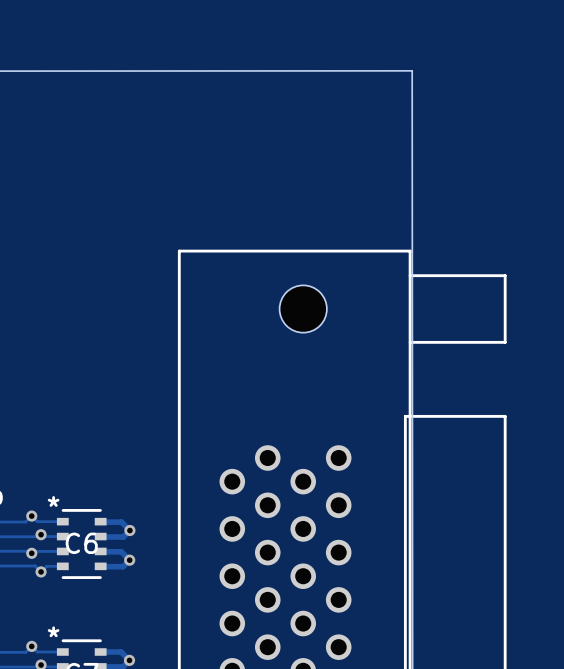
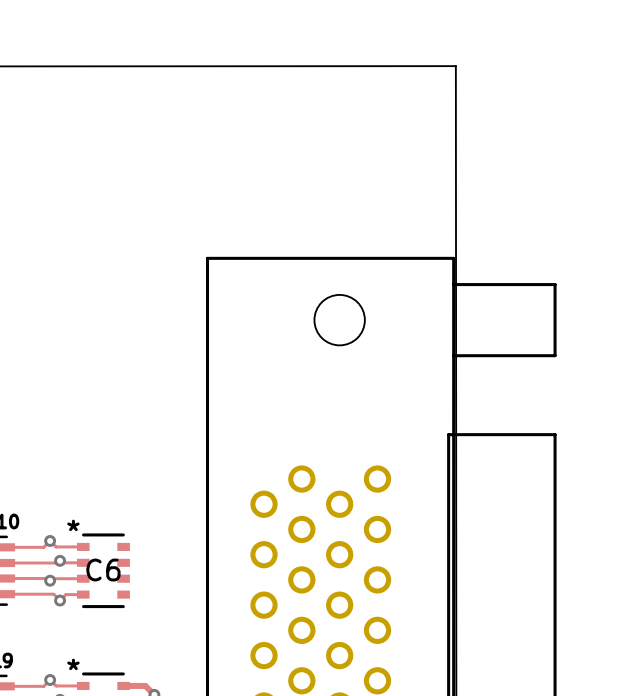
track: (101, 522) (121, 522) (129, 530) (123, 537) (101, 537) -> none
via: (129, 530) -> none
track: (100, 551) (121, 551) (129, 560) (123, 566) (100, 566) -> none
via: (129, 560) -> none

